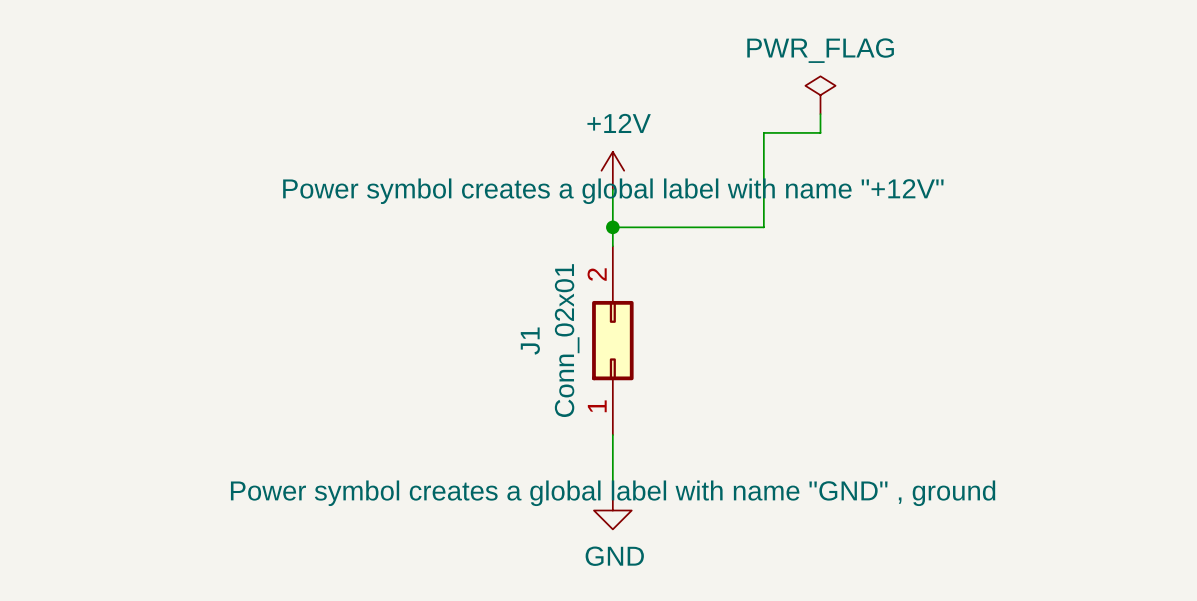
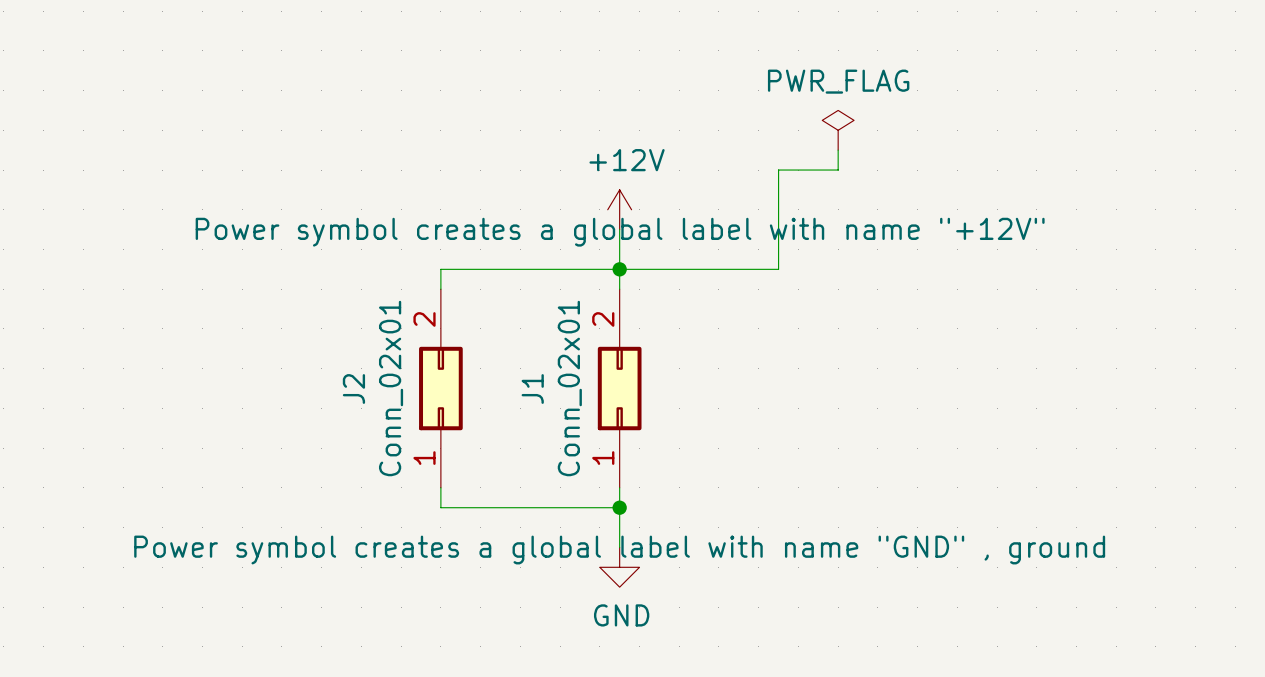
wire: none -> (619, 269) (440, 269) (440, 289)
J2: none -> Conn_02x01 (440, 388)
wire: none -> (440, 487) (440, 507) (619, 507)
junction: none -> (619, 507)

